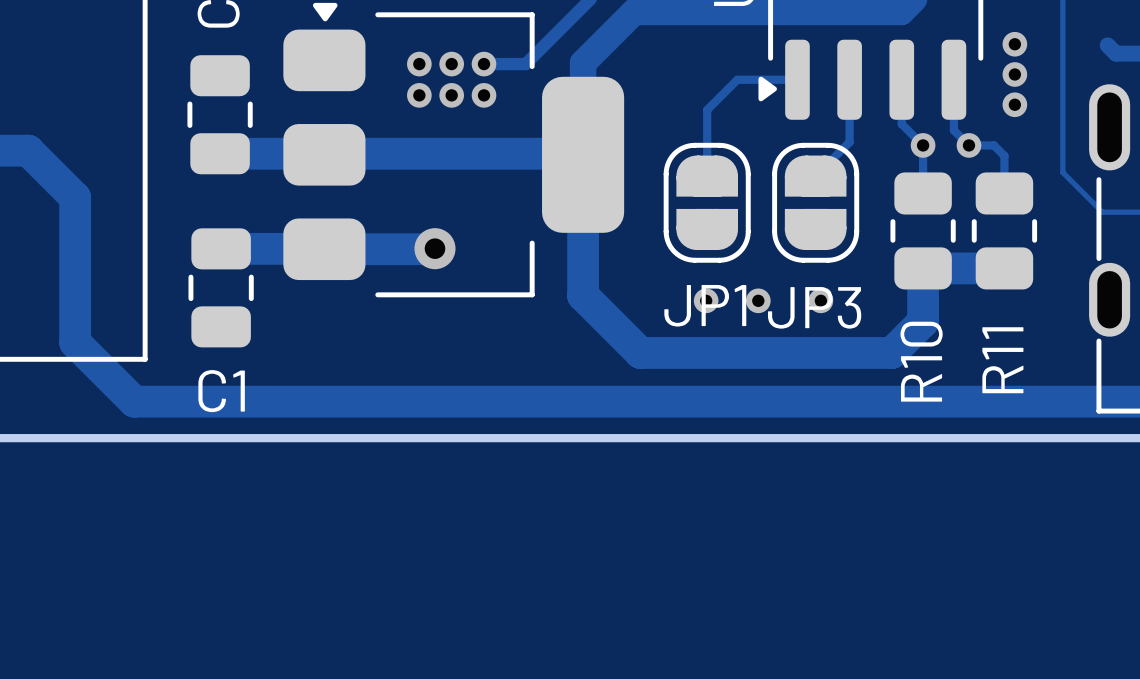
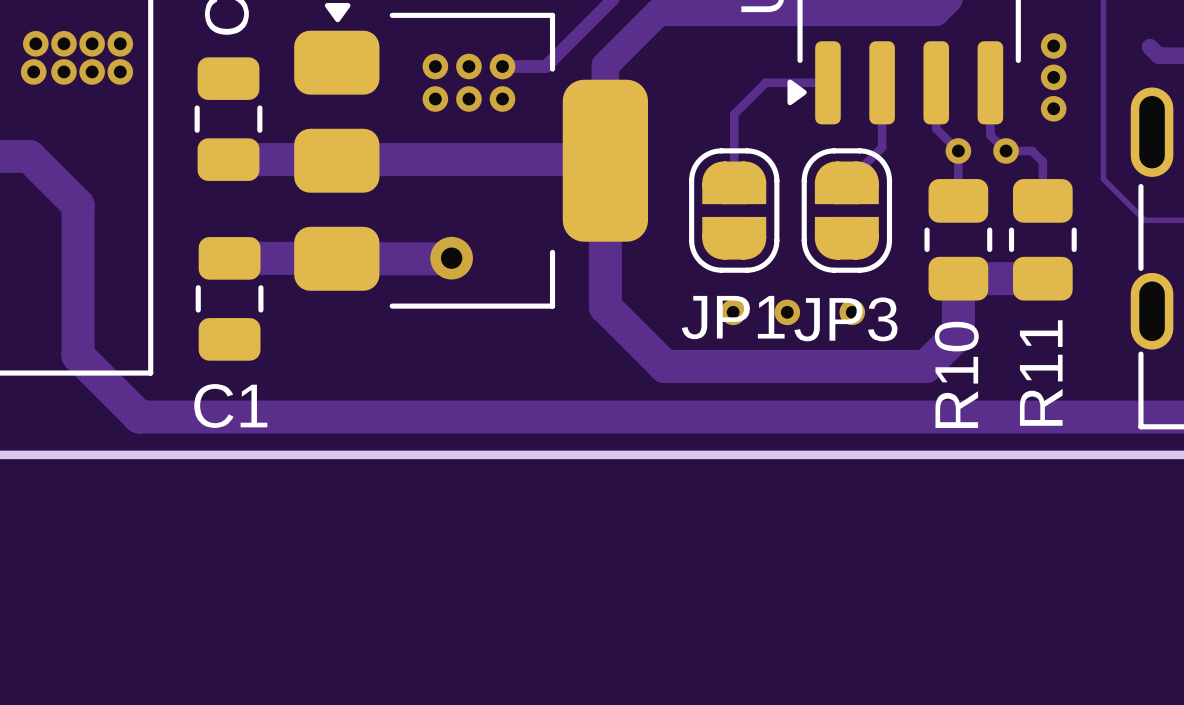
via: none -> (35, 43)
via: none -> (63, 43)
via: none -> (92, 43)
via: none -> (120, 43)
via: none -> (33, 71)
via: none -> (63, 71)
via: none -> (92, 71)
via: none -> (120, 71)

